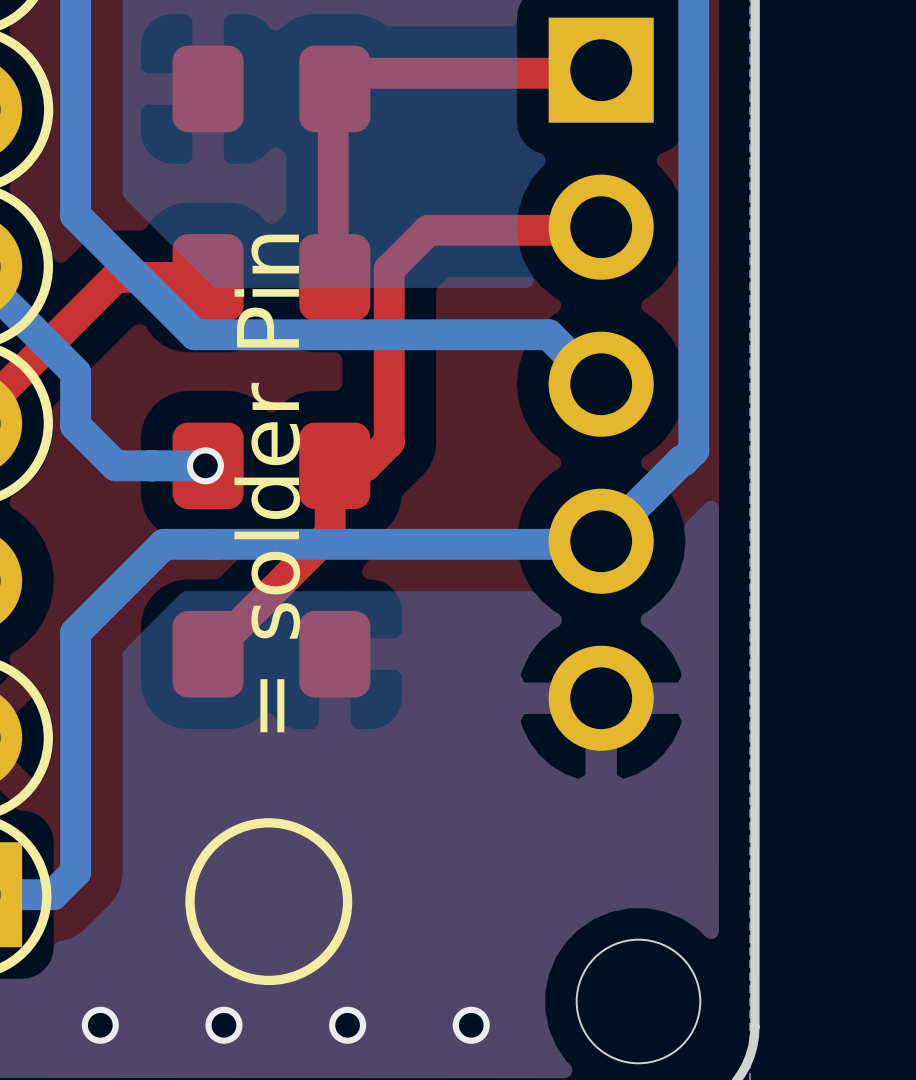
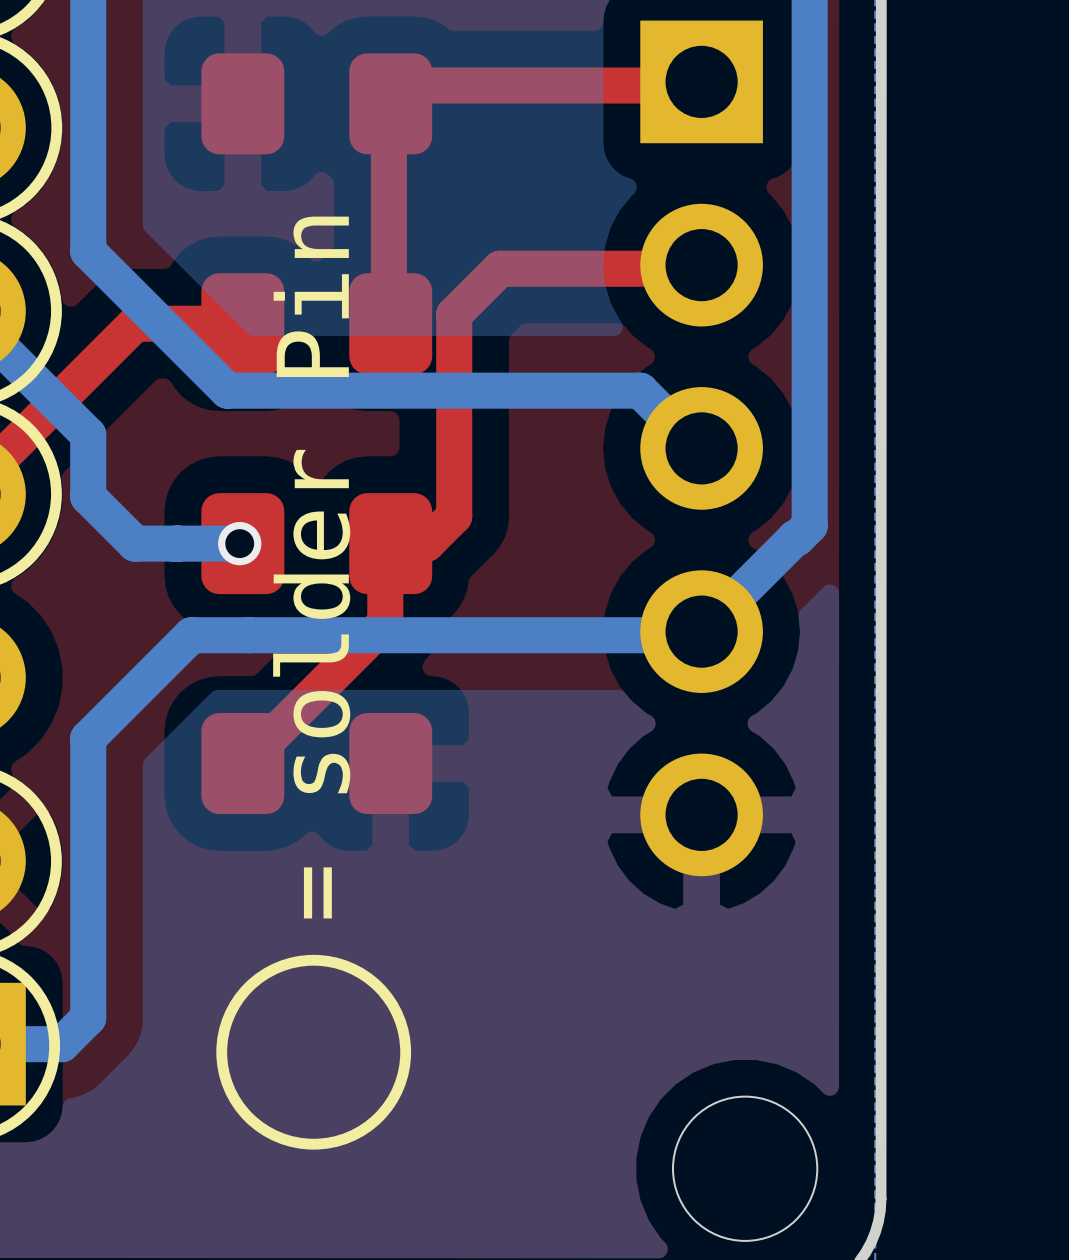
via: (100, 1025) -> none
via: (223, 1025) -> none
via: (347, 1025) -> none
via: (471, 1025) -> none

